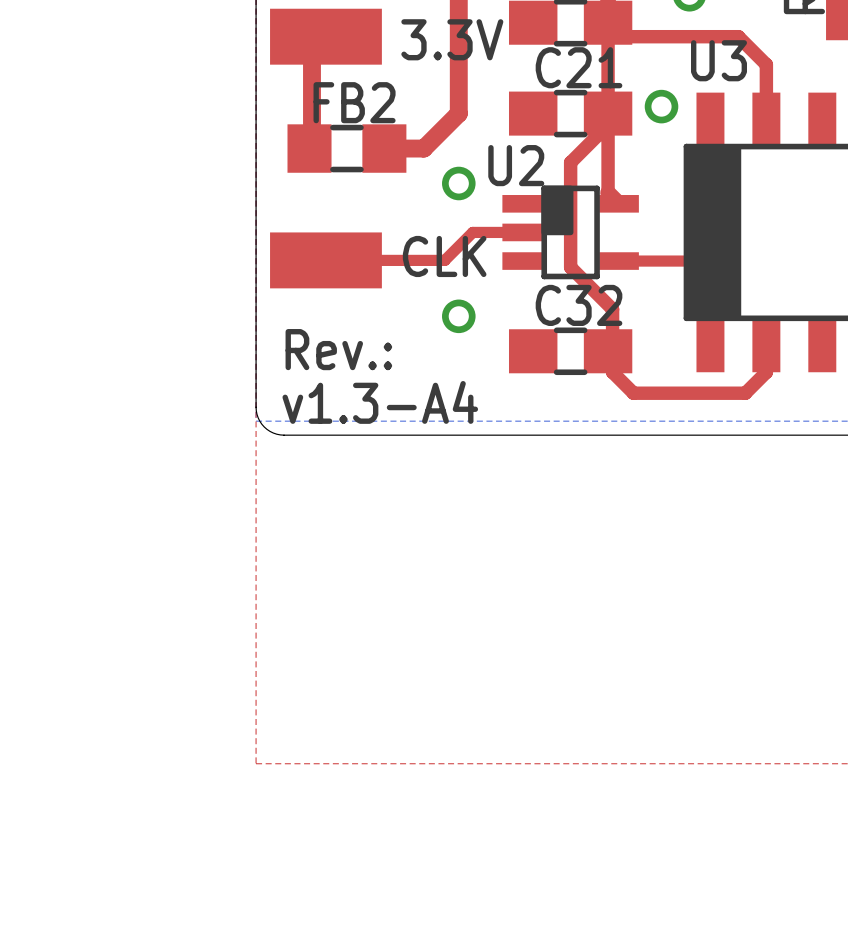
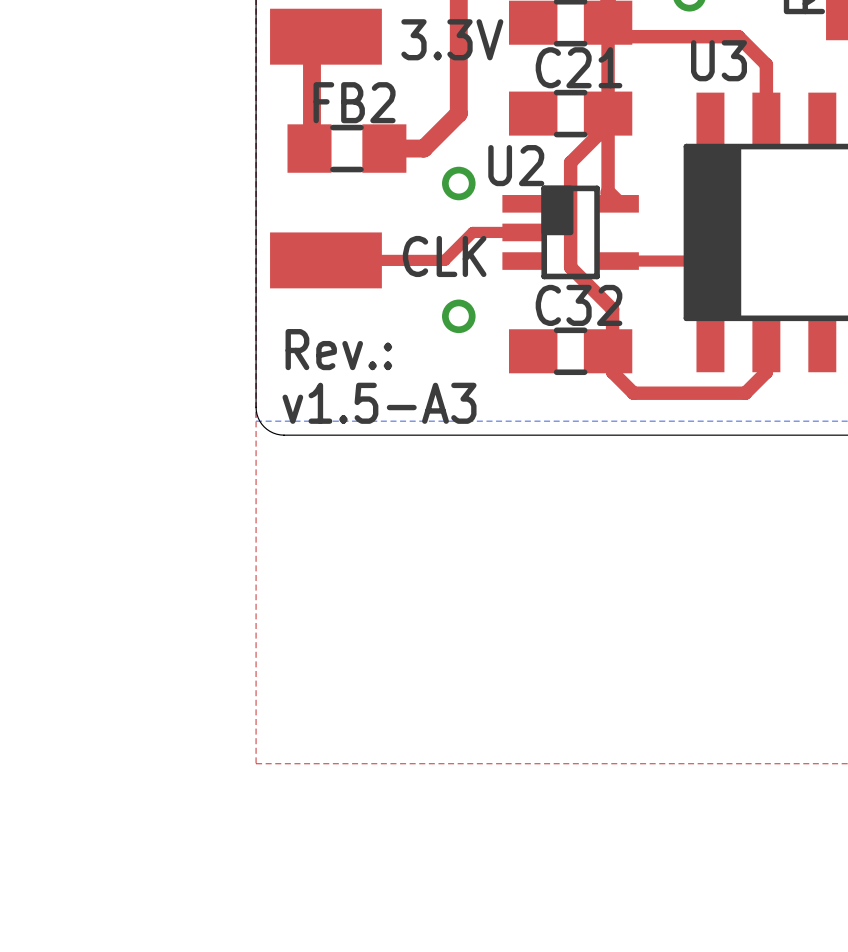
via: (661, 106) -> none
text: v1.3-A4 (380, 402) -> v1.5-A3 (379, 403)

